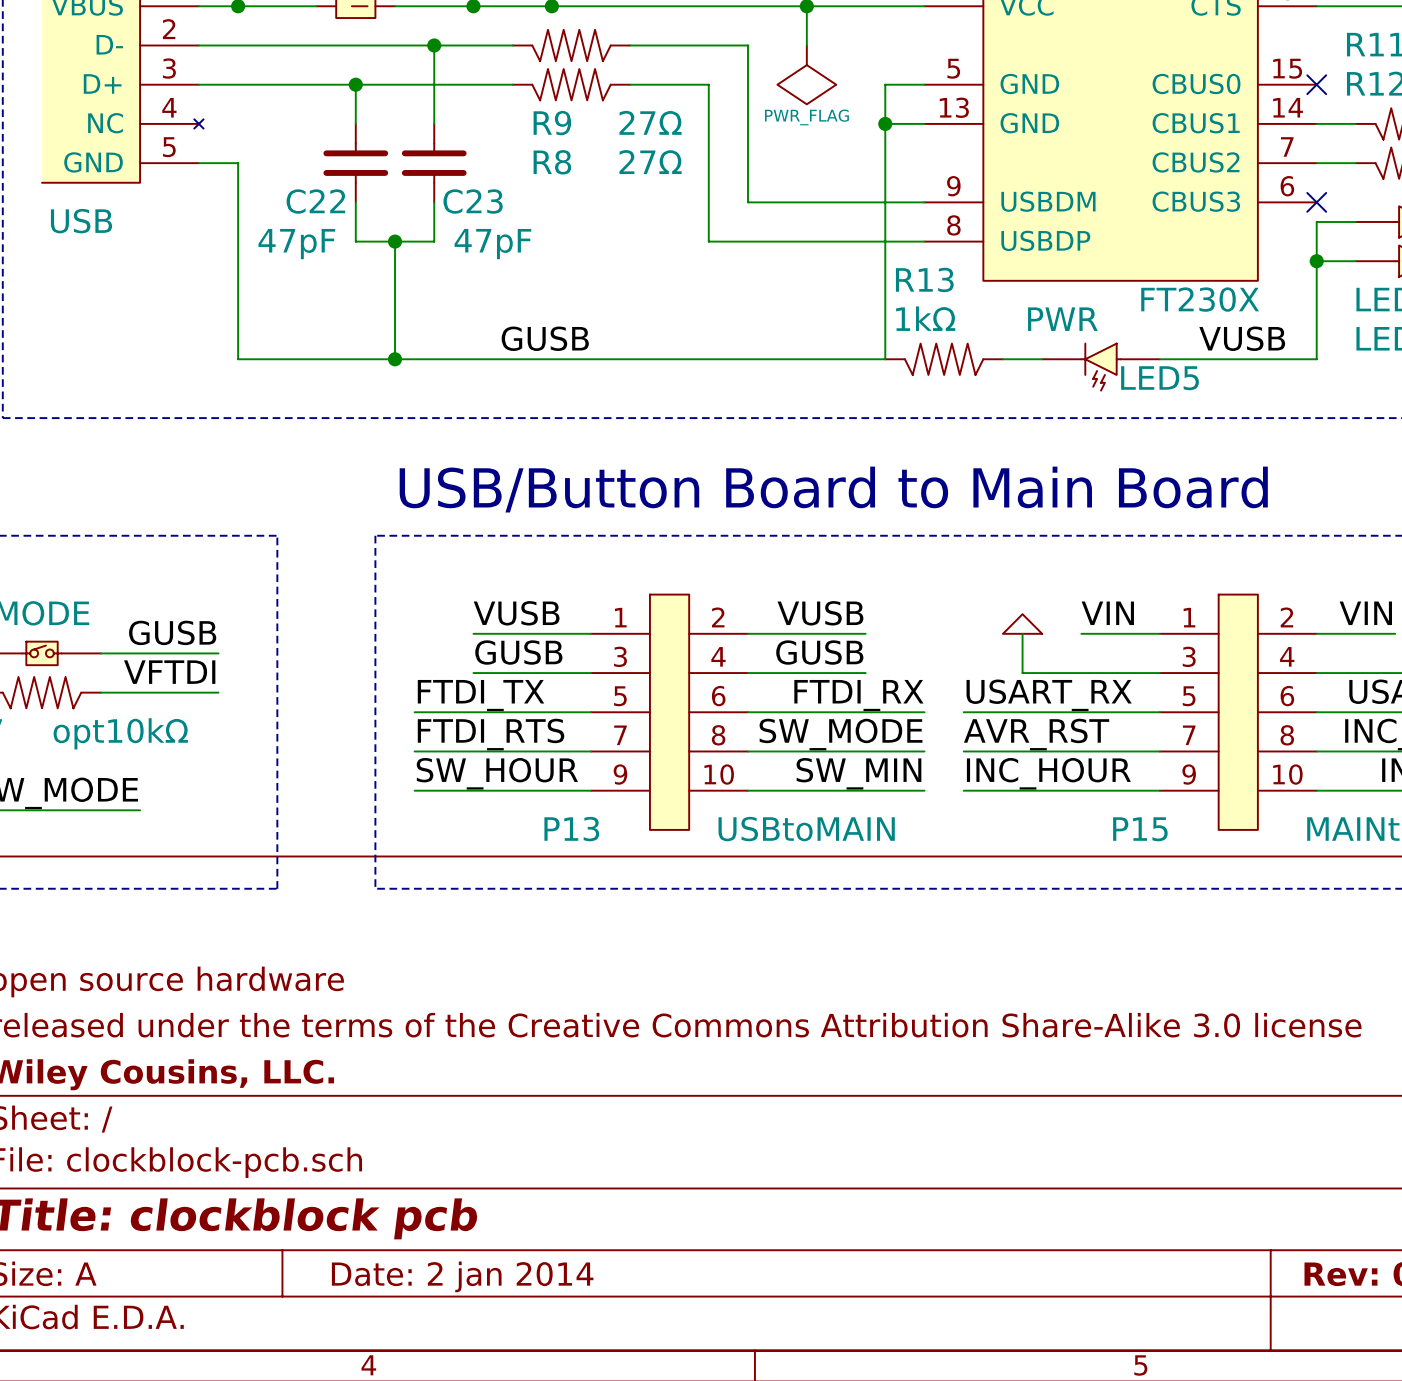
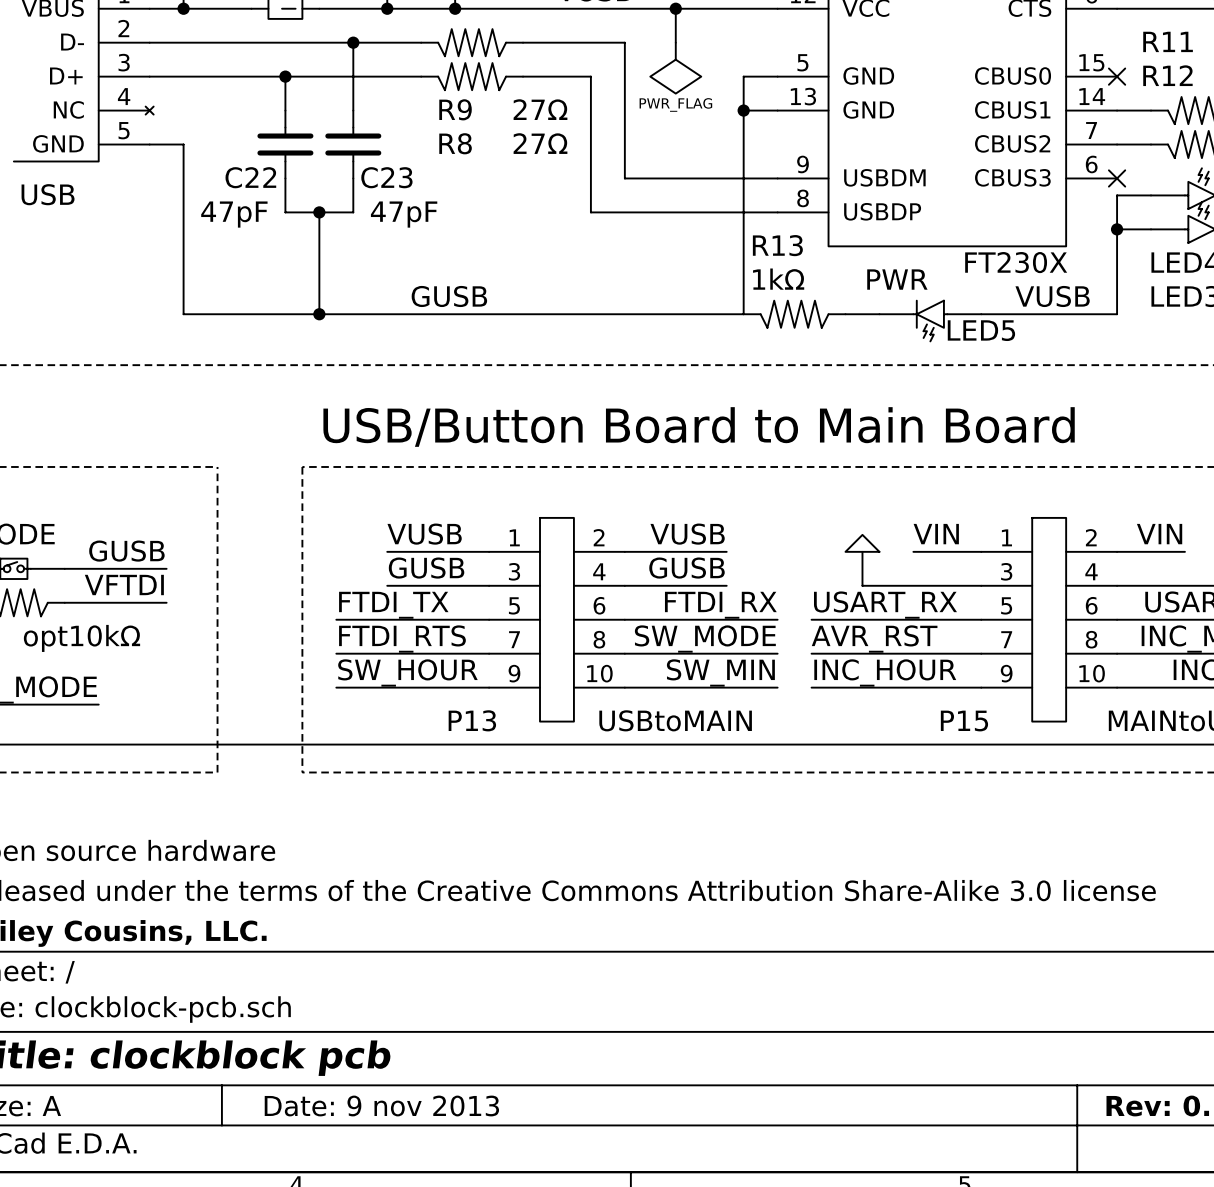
title block: Date: 2 jan 2014 (462, 1276) -> Date: 9 nov 2013 (381, 1105)

